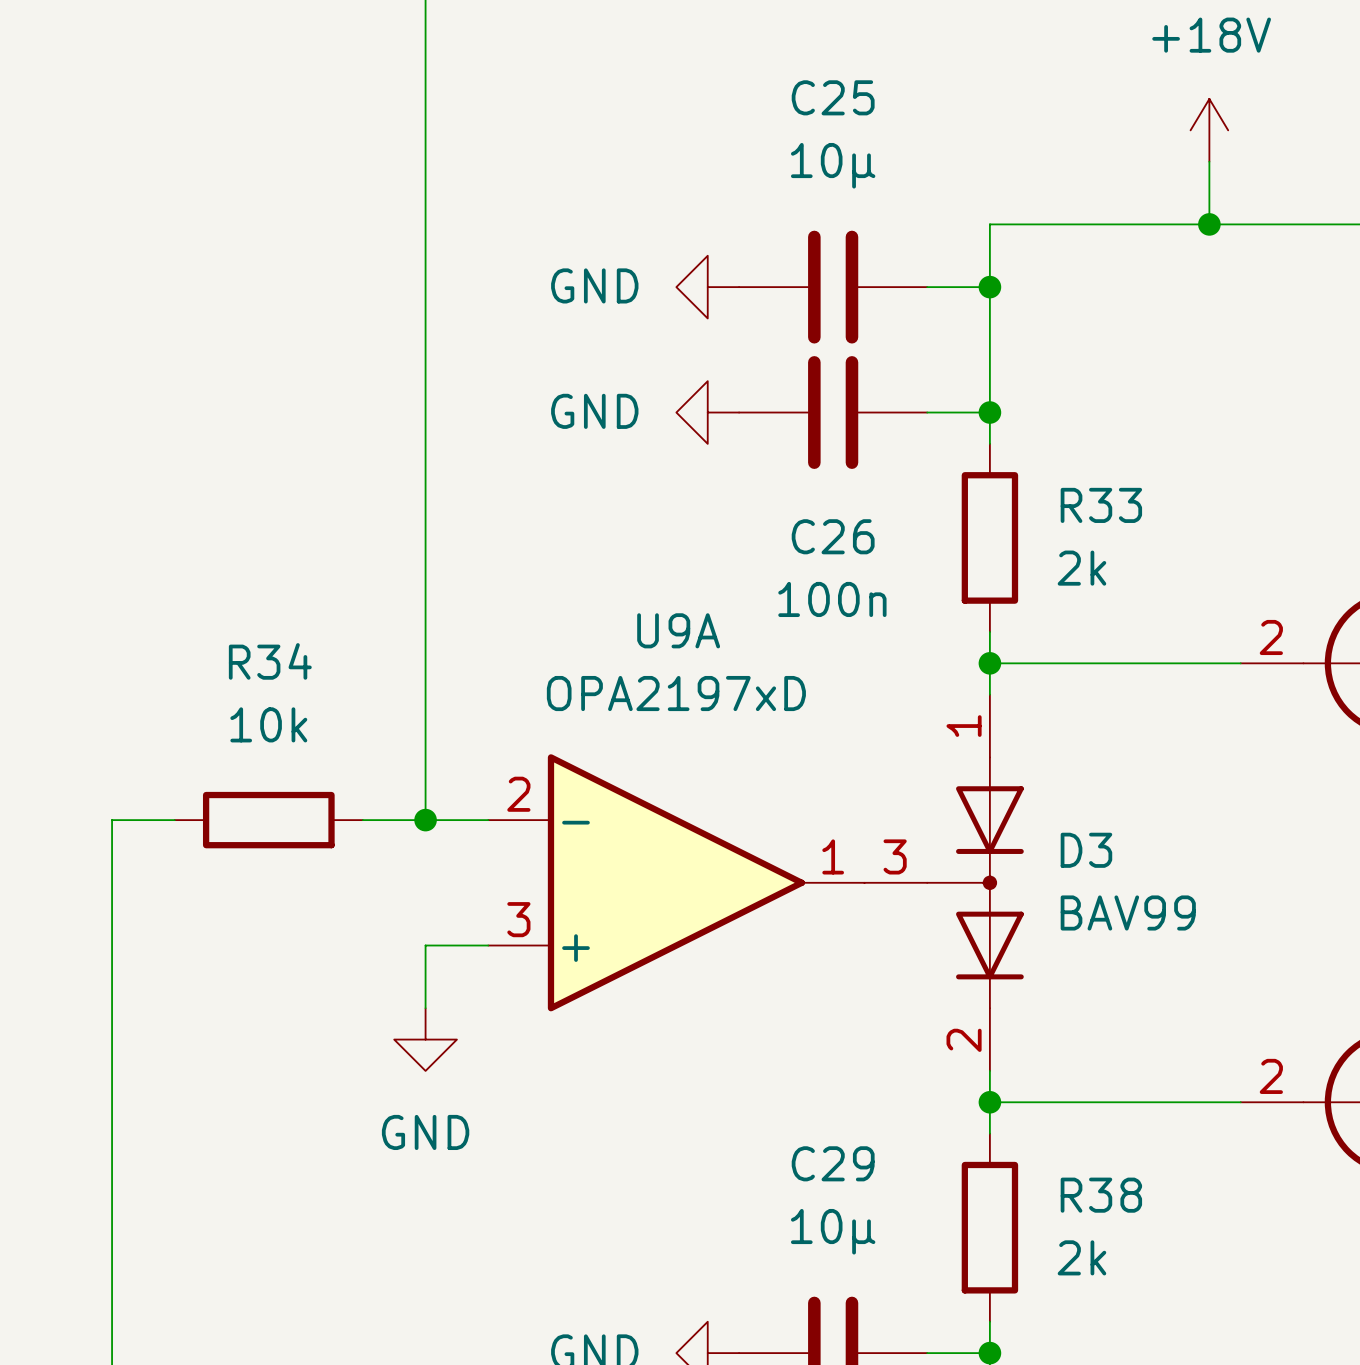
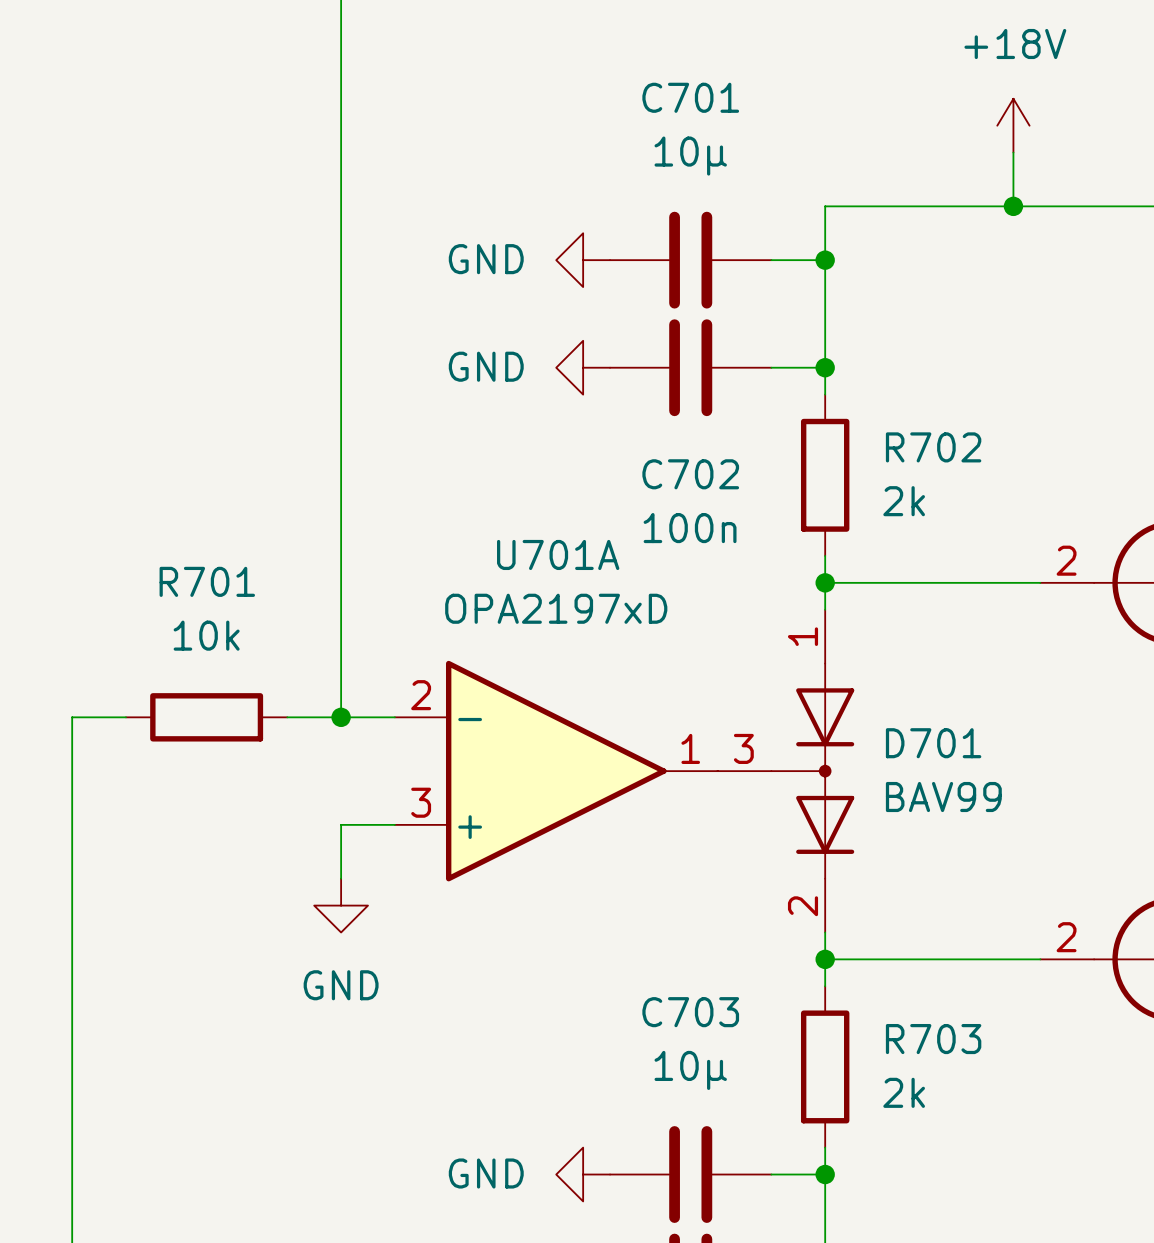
C25 name: C25 (833, 97) -> C701 (690, 97)
R33 name: R33 (1101, 505) -> R702 (933, 447)
C26 name: C26 (833, 536) -> C702 (690, 474)
U9A name: U9A (678, 630) -> U701A (558, 554)
R34 name: R34 (270, 661) -> R701 (207, 581)
D3 name: D3 (1086, 850) -> D701 (933, 743)
C29 name: C29 (833, 1163) -> C703 (690, 1012)
R38 name: R38 (1101, 1195) -> R703 (933, 1039)

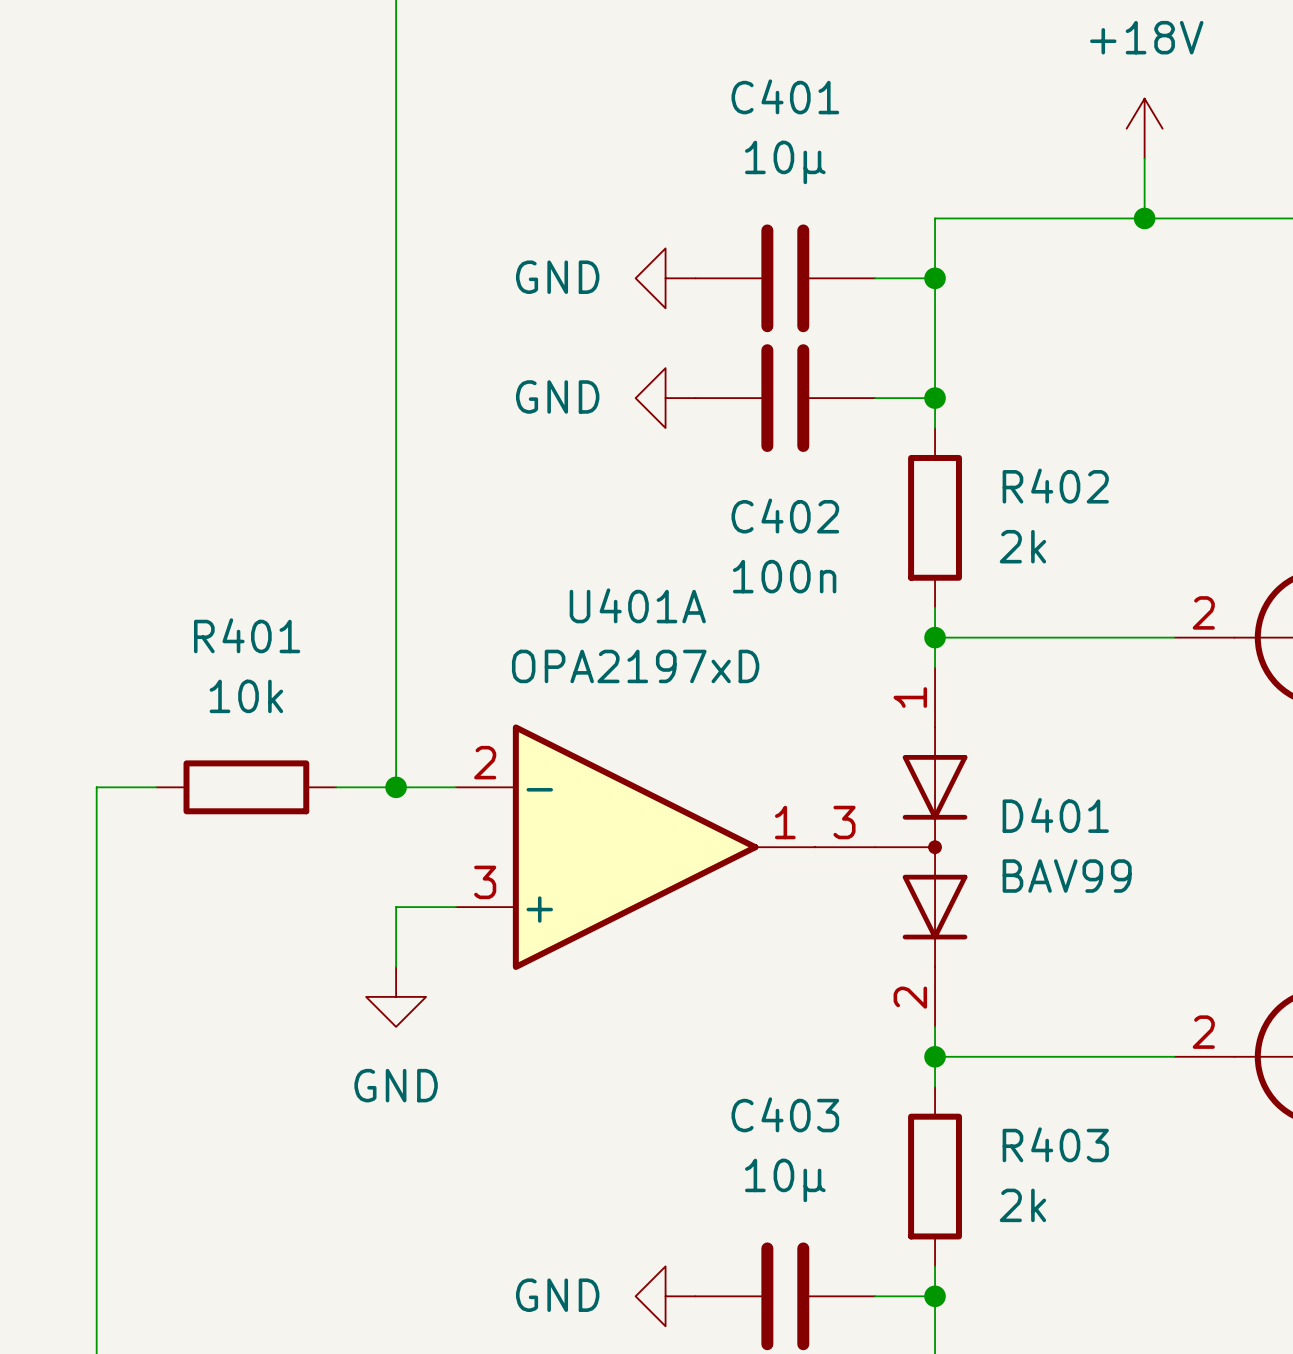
C701 name: C701 (690, 97) -> C401 (785, 96)
R702 name: R702 (933, 447) -> R402 (1055, 486)
C702 name: C702 (690, 474) -> C402 (785, 516)
U701A name: U701A (558, 554) -> U401A (637, 605)
R701 name: R701 (207, 581) -> R401 (247, 635)
D701 name: D701 (933, 743) -> D401 (1055, 815)
C703 name: C703 (690, 1012) -> C403 (785, 1114)
R703 name: R703 (933, 1039) -> R403 (1055, 1144)

